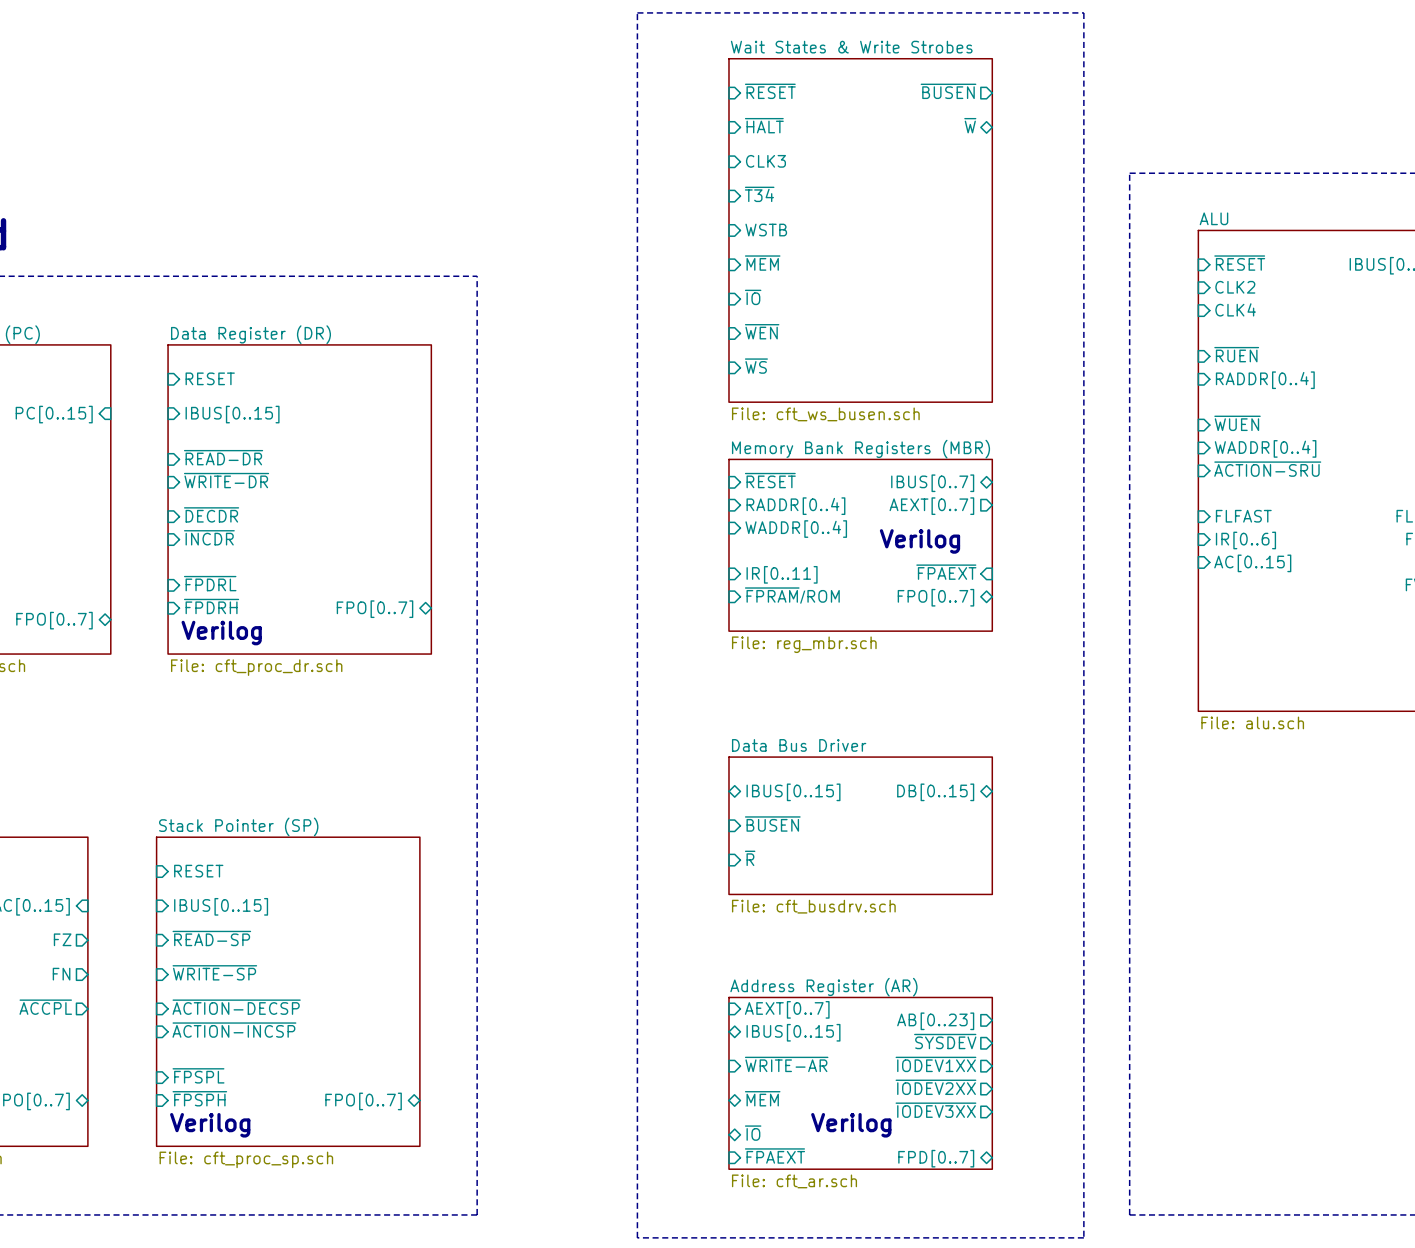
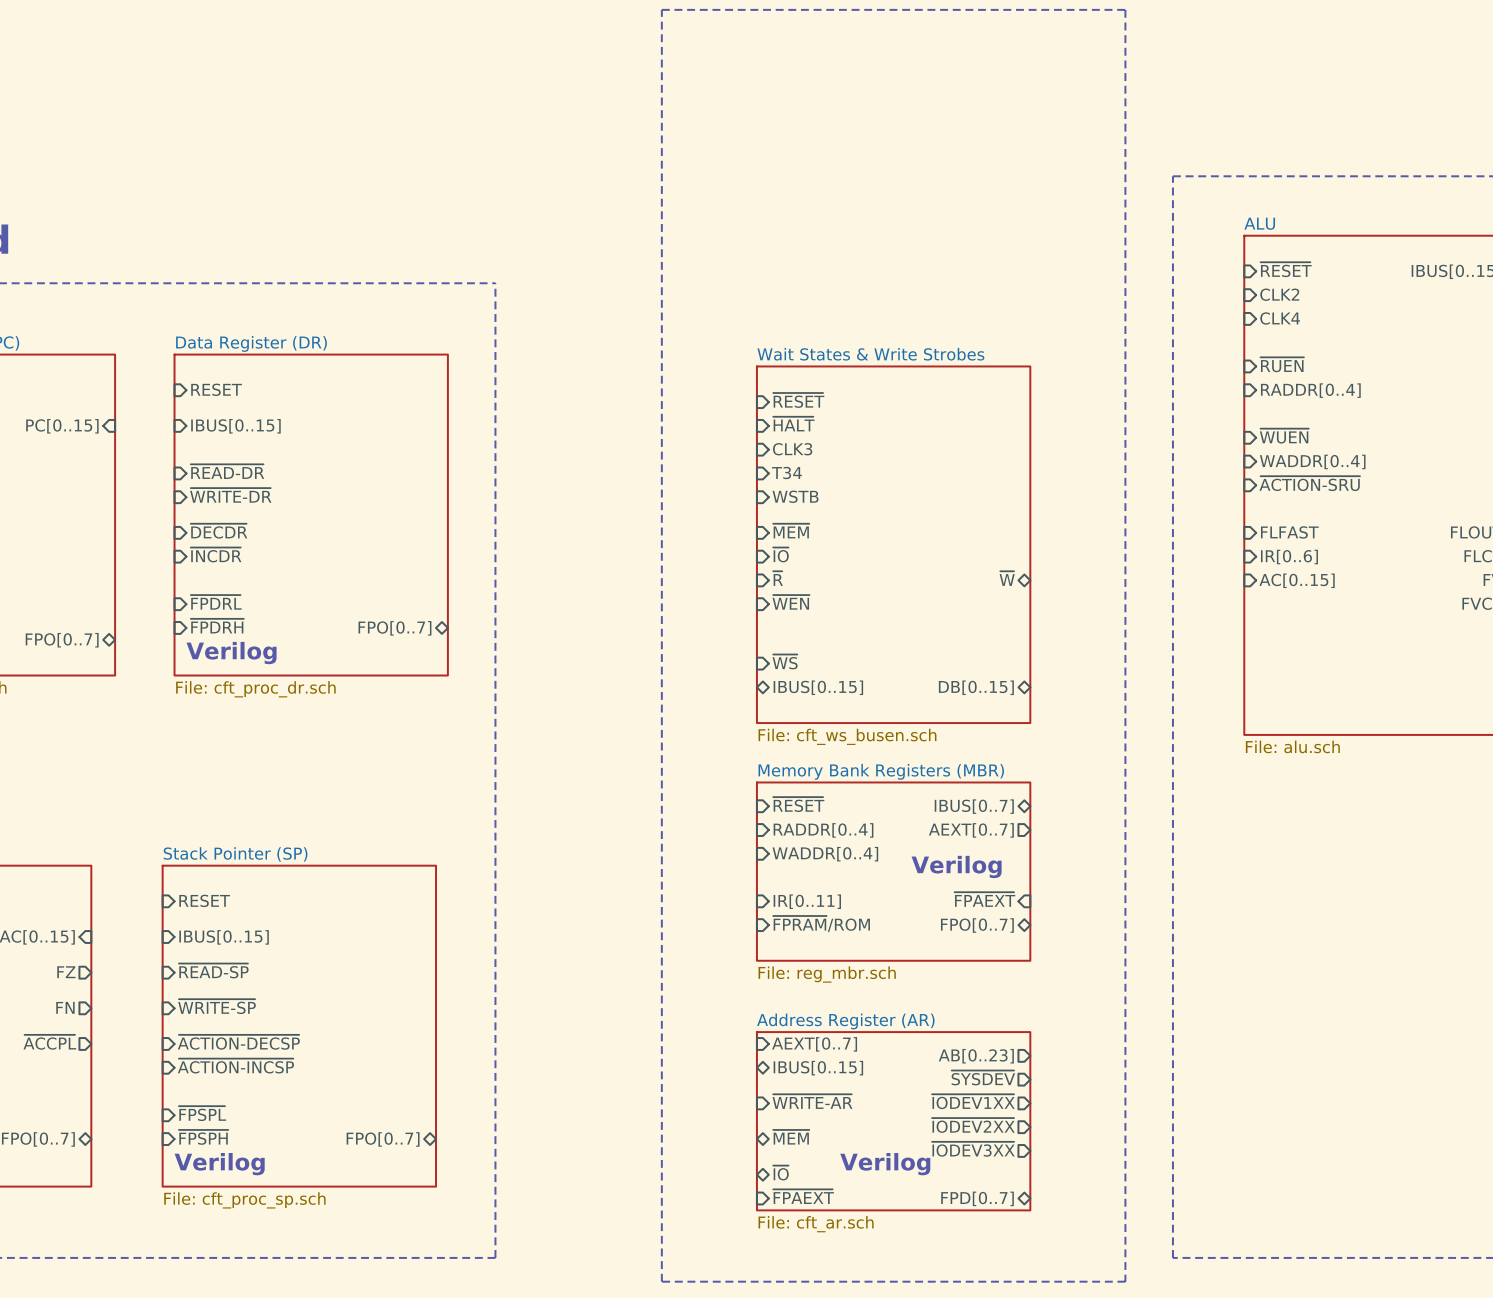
sheet pin: ~{RESET} (770, 91) -> none
sheet pin: ~{BUSEN} (948, 91) -> none
sheet pin: ~{HALT} (764, 125) -> none
sheet pin: ~{W} (970, 125) -> none
sheet pin: CLK3 (765, 161) -> none
sheet pin: ~{T34} (759, 194) -> none
sheet pin: WSTB (766, 230) -> none
sheet Wait States & Write Strobes: File: cft_ws_busen.sch (860, 230) -> none
sheet pin: ~{MEM} (762, 263) -> none
sheet pin: ~{IO} (753, 297) -> none
sheet pin: ~{WEN} (762, 331) -> none
sheet pin: ~{WS} (756, 366) -> ~{RESET} (798, 400)
sheet pin: none -> ~{HALT} (793, 424)
sheet pin: none -> CLK3 (792, 449)
sheet pin: none -> T34 (786, 473)
sheet pin: ~{RESET} (770, 480) -> WSTB (795, 496)
sheet pin: IBUS[0..7] (932, 483) -> none
sheet pin: RADDR[0..4] (795, 506) -> none
sheet pin: AEXT[0..7] (931, 506) -> none
sheet pin: none -> ~{MEM} (791, 531)
sheet Wait States & Write Strobes: none -> File: cft_ws_busen.sch (893, 544)
sheet pin: WADDR[0..4] (796, 529) -> none
sheet pin: none -> ~{IO} (780, 554)
text: Verilog (919, 541) -> none
sheet Memory Bank Registers (MBR): File: reg_mbr.sch (860, 545) -> none
sheet pin: none -> ~{R} (778, 578)
sheet pin: none -> ~{W} (1007, 578)
sheet pin: ~{FPAEXT} (946, 572) -> none
sheet pin: IR[0..11] (782, 574) -> none
sheet pin: none -> ~{WEN} (791, 602)
sheet pin: ~{FPRAM}∕ROM (792, 595) -> none
sheet pin: FPO[0..7] (935, 597) -> none
sheet pin: none -> ~{WS} (785, 661)
sheet pin: none -> ~{RESET} (798, 804)
sheet pin: none -> IBUS[0..7] (974, 806)
sheet pin position: IBUS[0..15] (793, 792) -> IBUS[0..15] (818, 687)
sheet pin position: DB[0..15] (935, 792) -> DB[0..15] (976, 687)
sheet pin: none -> RADDR[0..4] (823, 830)
sheet pin: none -> AEXT[0..7] (971, 830)
sheet pin: ~{BUSEN} (772, 824) -> WADDR[0..4] (825, 854)
sheet Data Bus Driver: File: cft_busdrv.sch (860, 825) -> none
text: none -> Verilog (956, 866)
sheet Memory Bank Registers (MBR): none -> File: reg_mbr.sch (893, 871)
sheet pin: ~{R} (750, 858) -> none
sheet pin: none -> ~{FPAEXT} (984, 899)
sheet pin: none -> IR[0..11] (807, 901)
sheet pin: none -> ~{FPRAM}∕ROM (821, 924)
sheet pin: none -> FPO[0..7] (977, 925)

